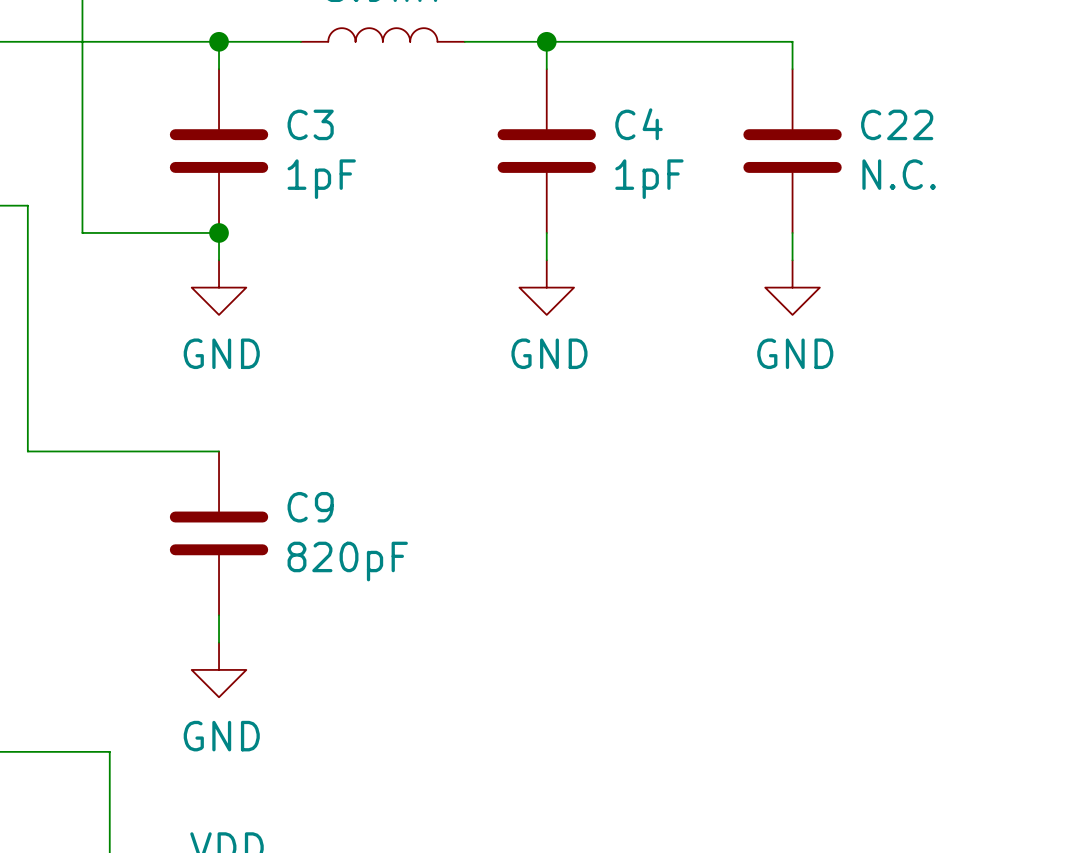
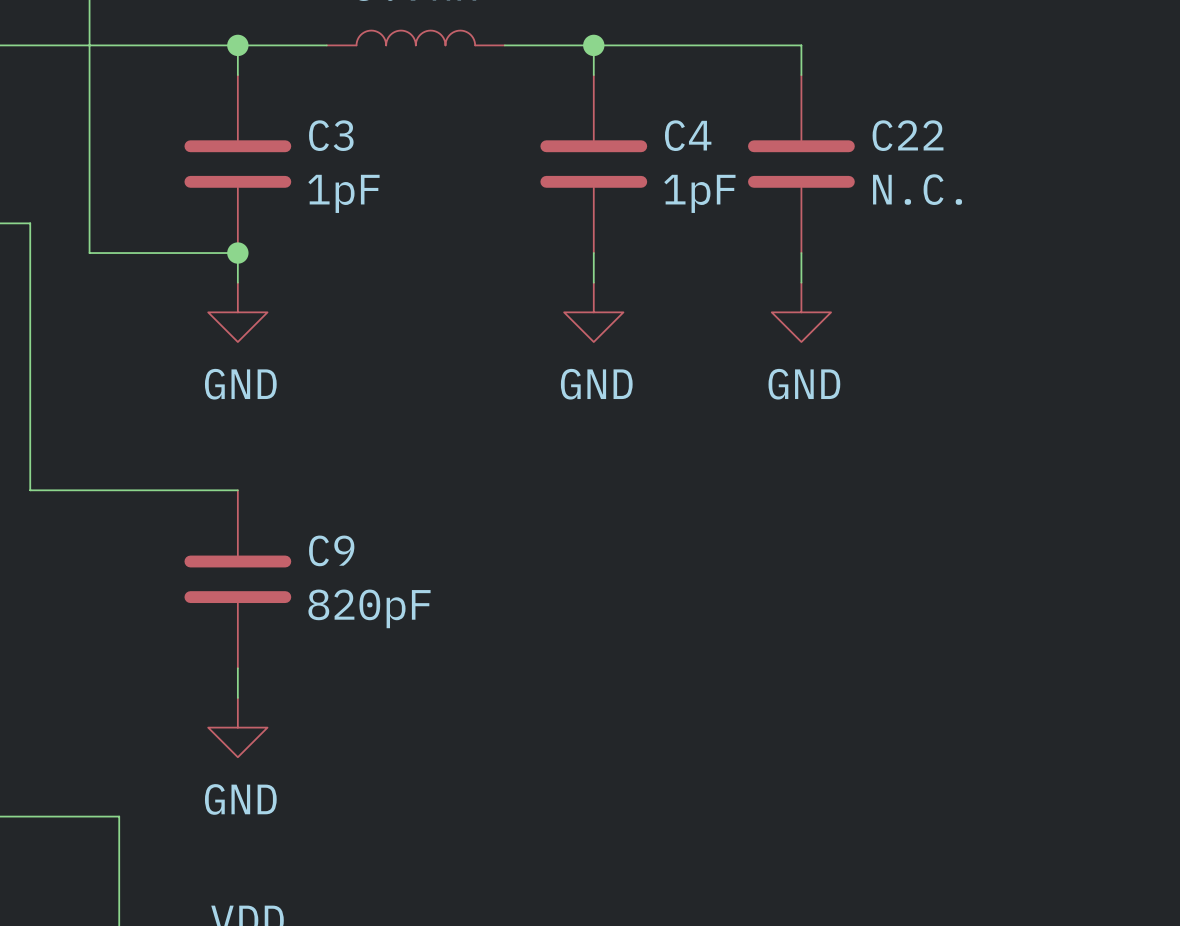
wire: (737, 41) (792, 41) (792, 69) -> (801, 45) (801, 75)
C22 position: (792, 151) -> (801, 164)
wire: (792, 232) (792, 260) -> (801, 253) (801, 282)
power symbol position: GND (792, 287) -> GND (801, 312)

